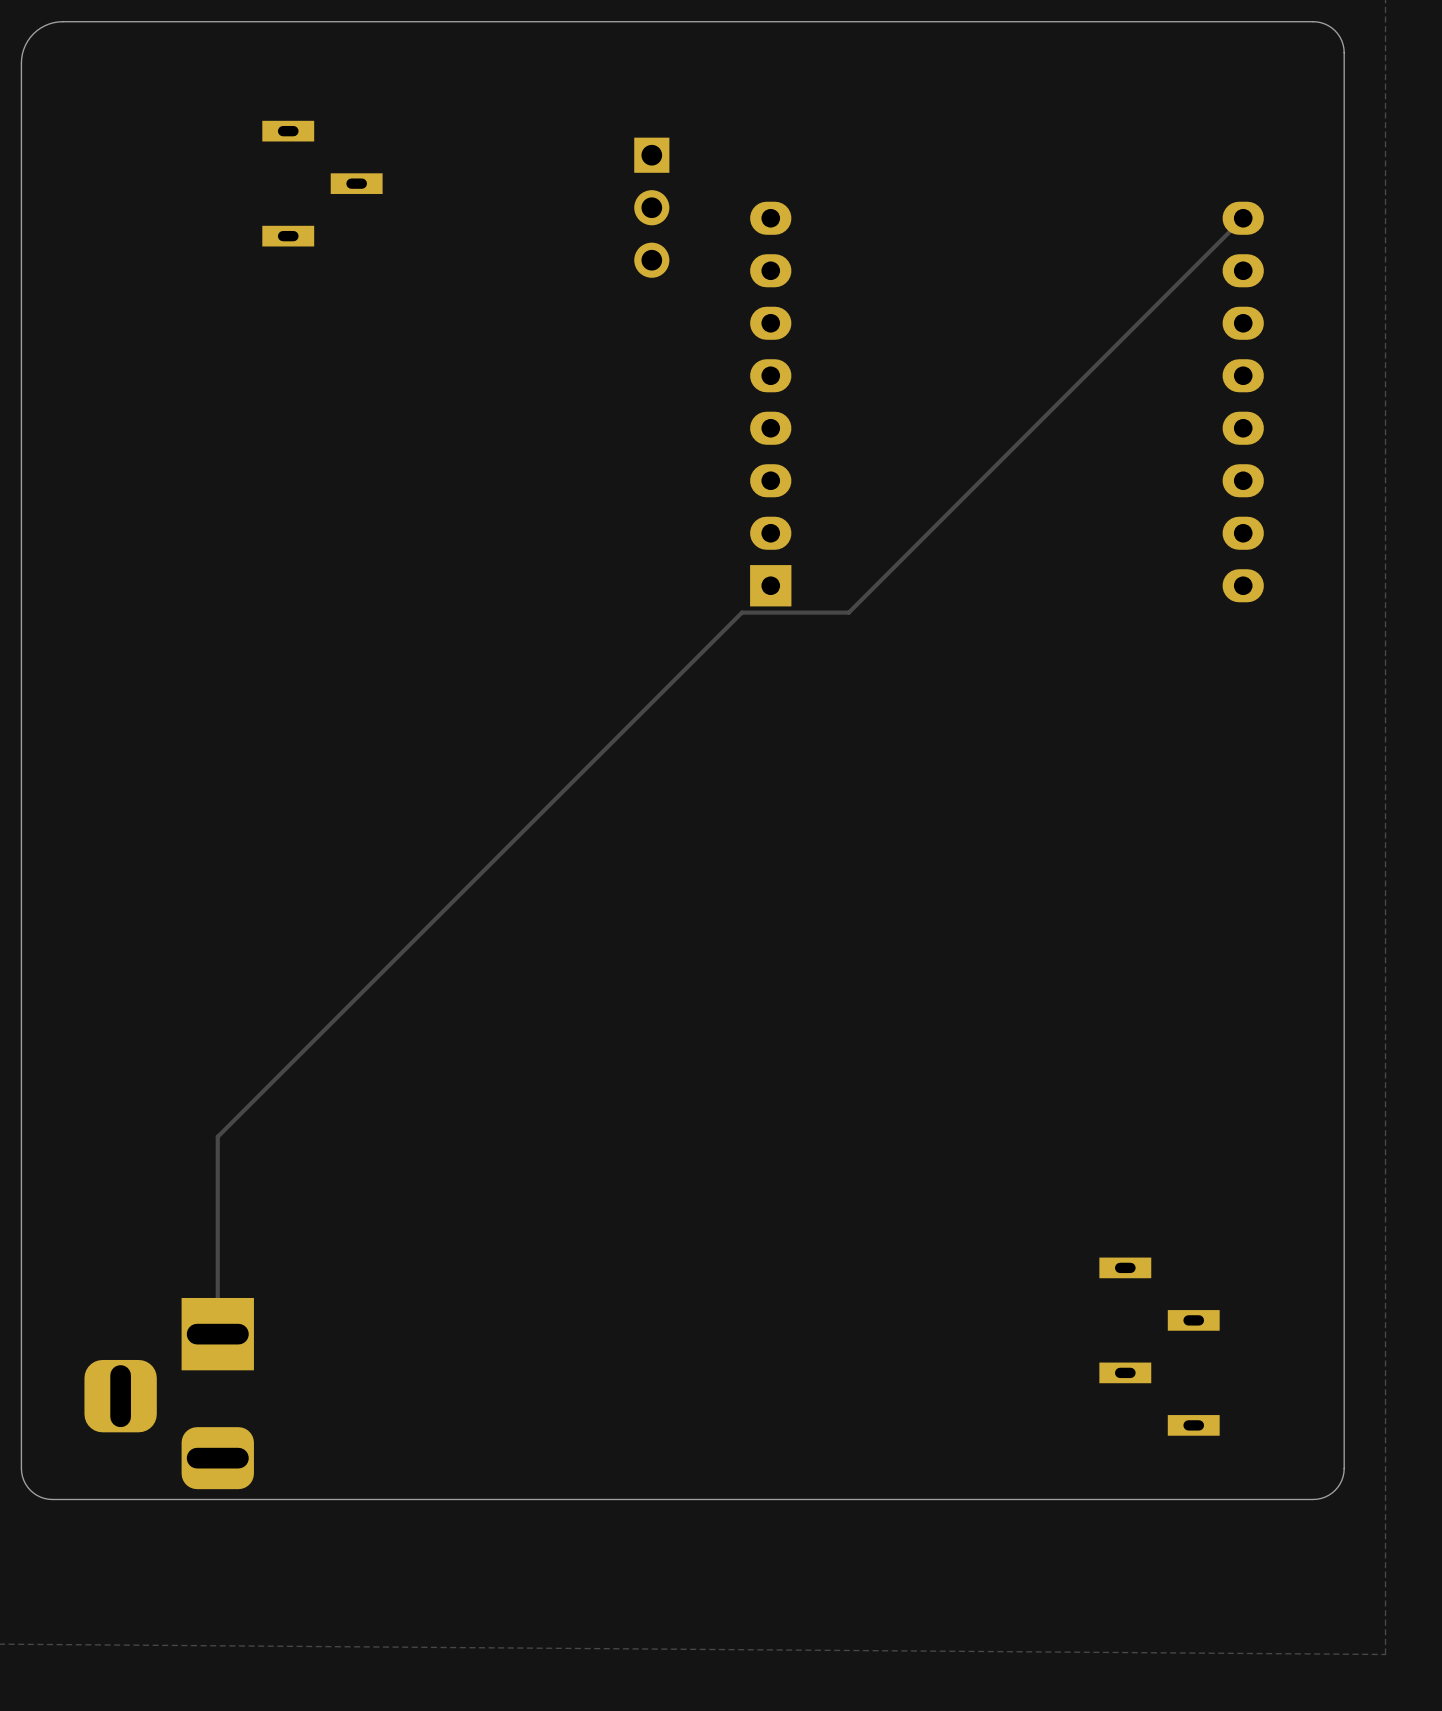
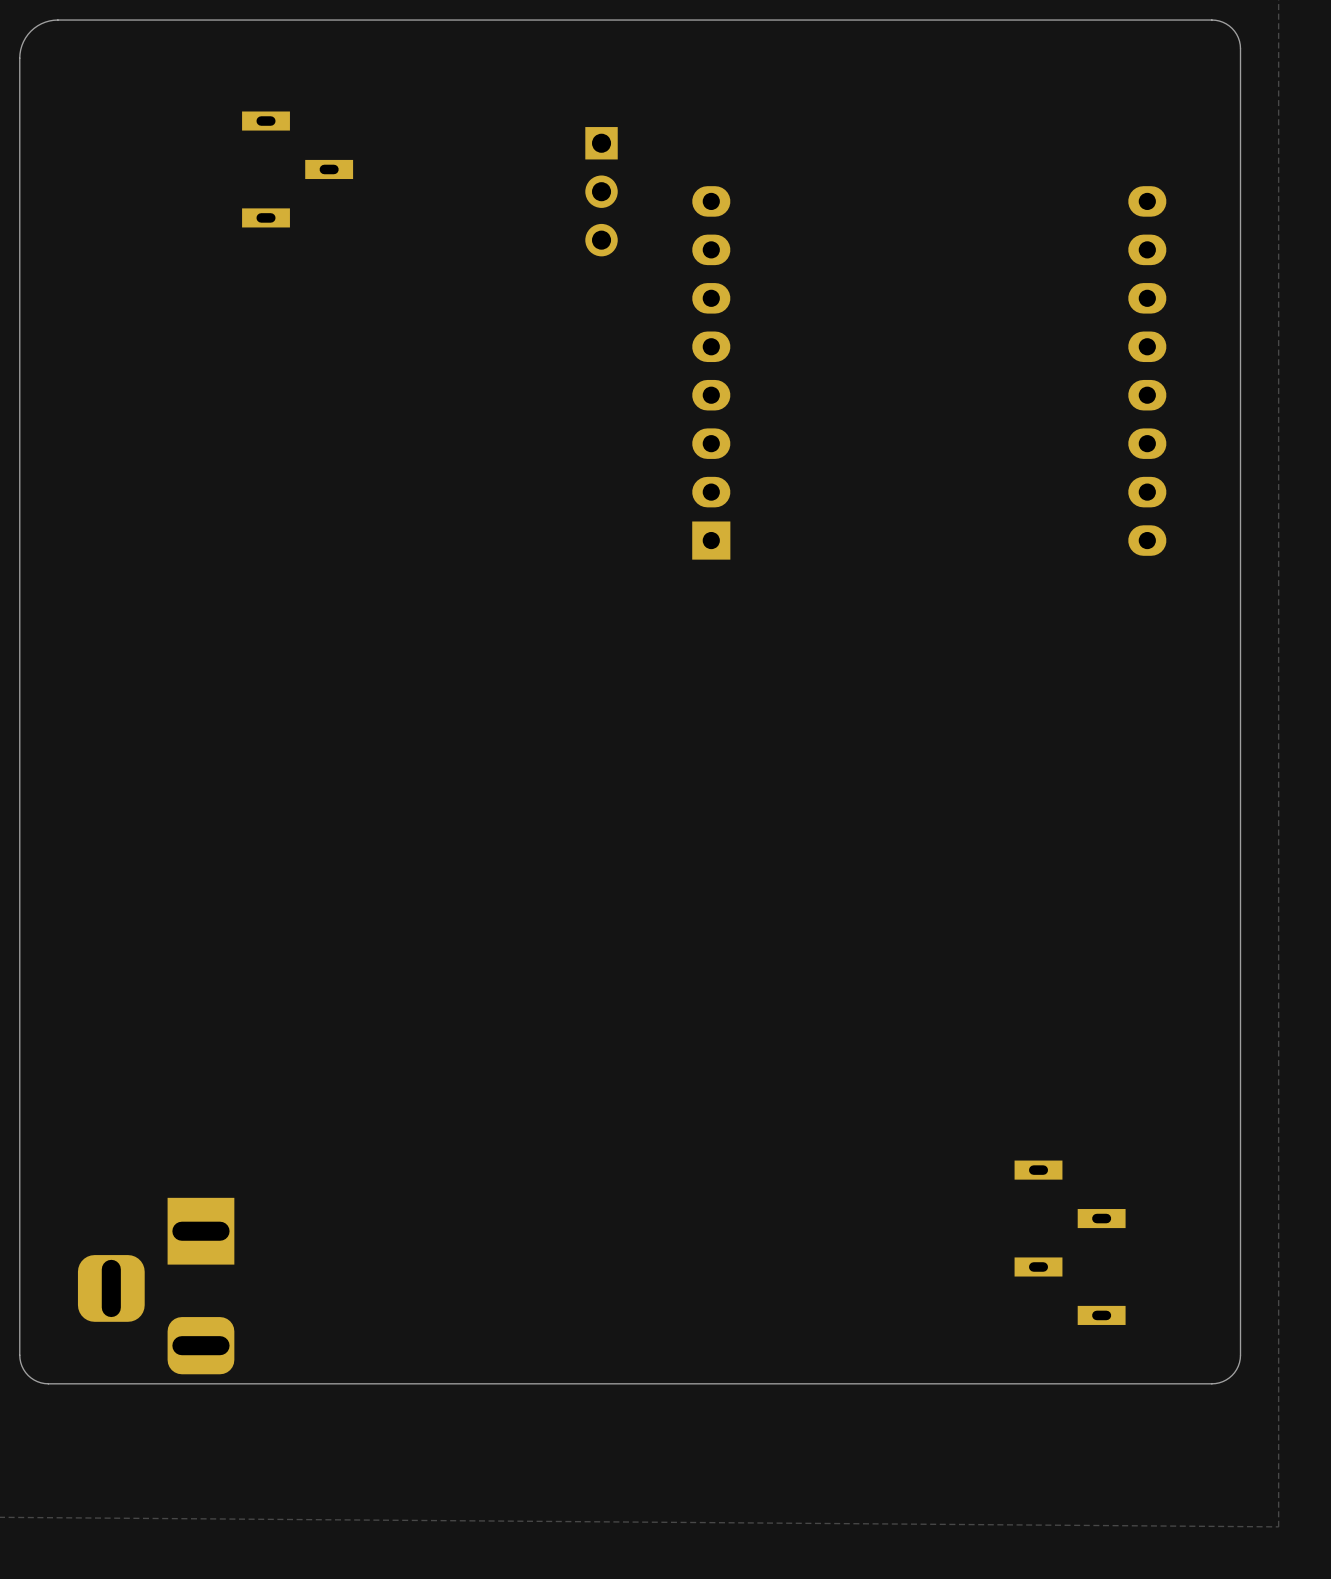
track: (1243, 218) (848, 612) (741, 612) (217, 1136) (217, 1334) -> none

